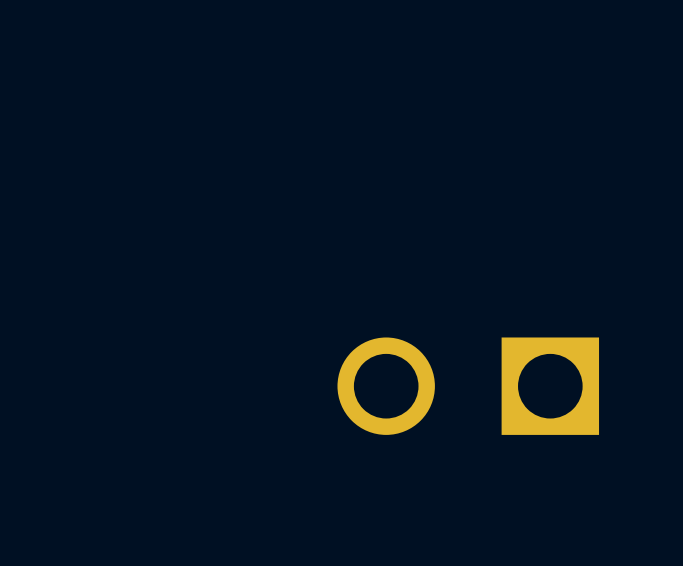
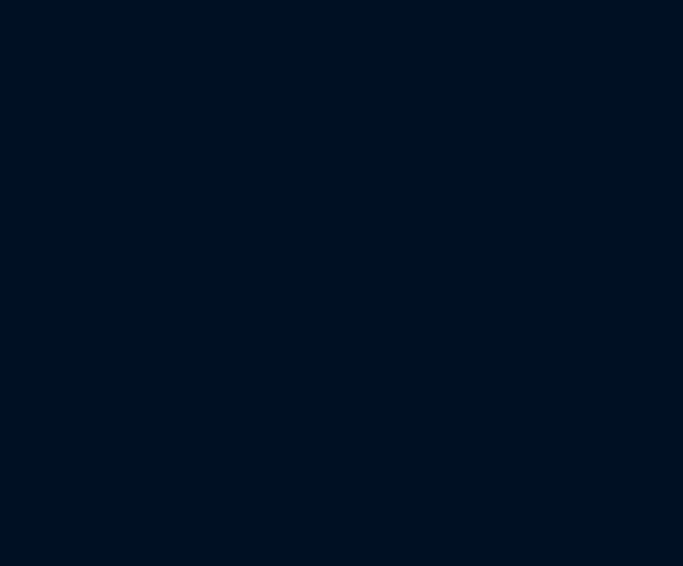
part: (468, 386) -> none

